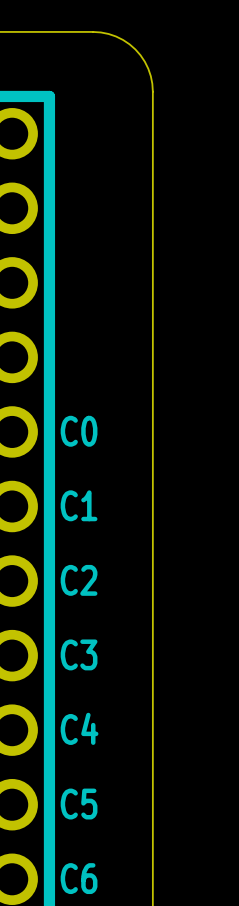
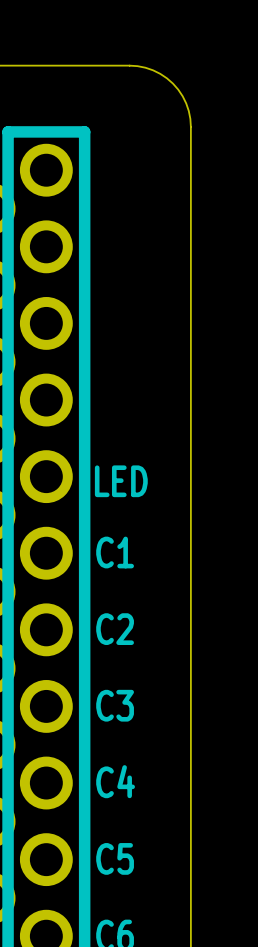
text: C0 (79, 431) -> LED (121, 481)

